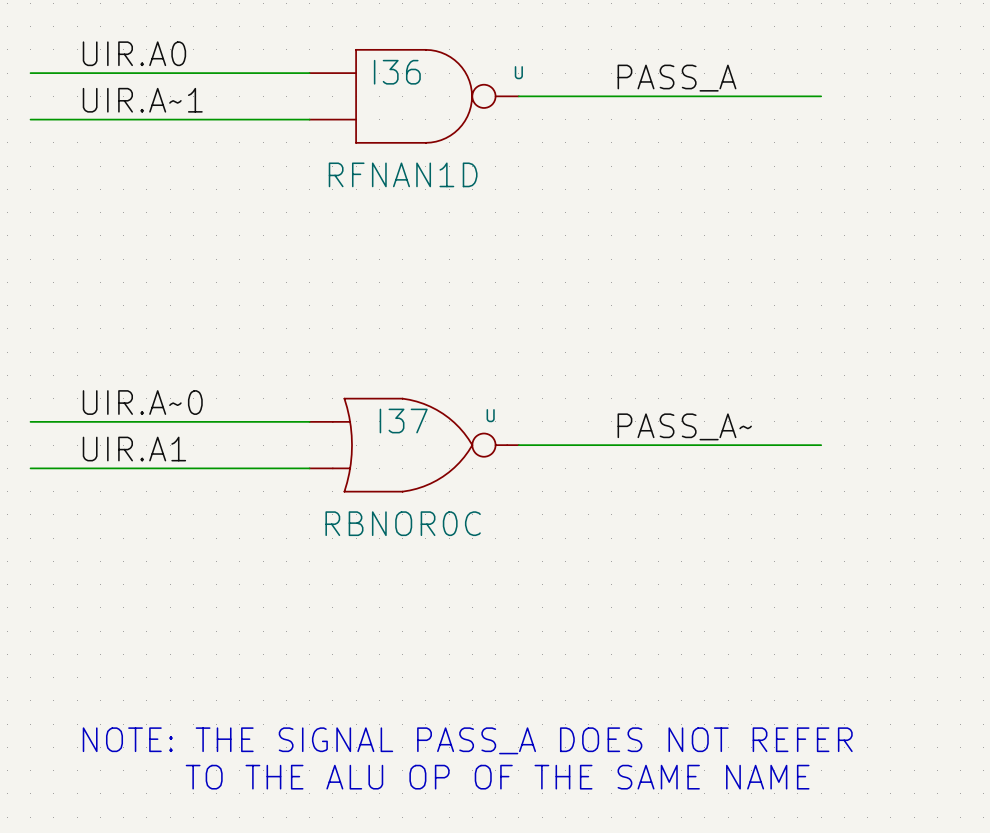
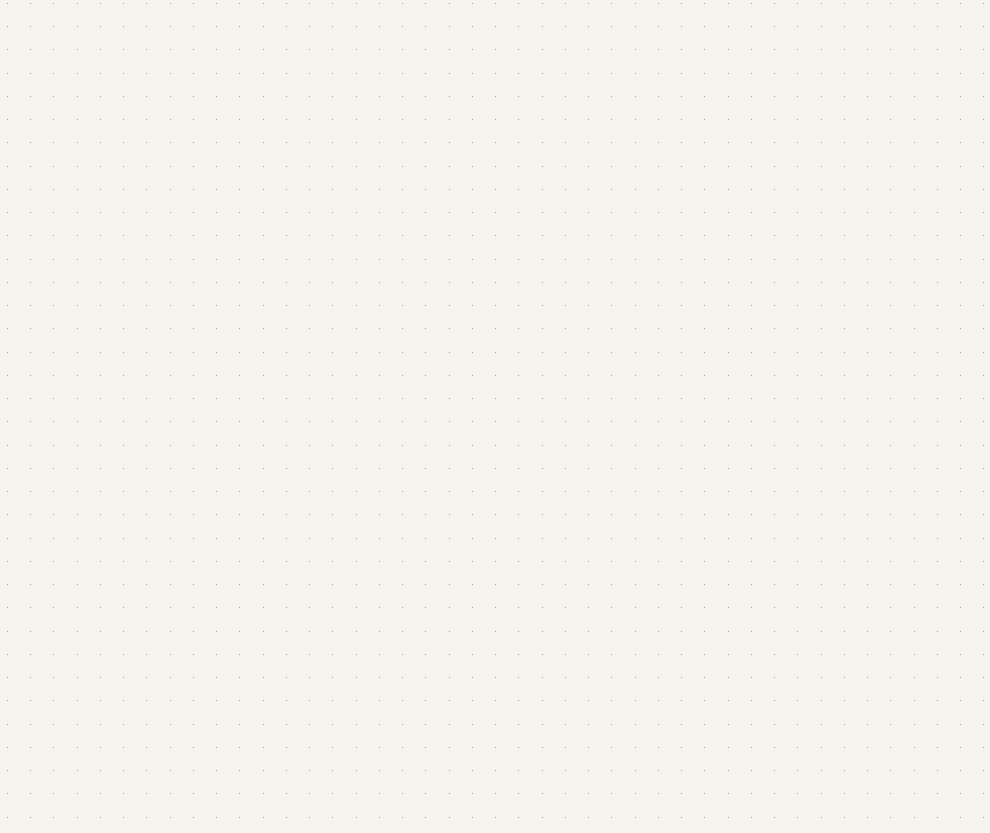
label: UIR.A0 (134, 53) -> none
wire: (30, 73) (309, 73) -> none
label: PASS_A (676, 78) -> none
U: (414, 96) -> none
wire: (518, 96) (821, 96) -> none
label: UIR.A~1 (142, 100) -> none
wire: (30, 119) (309, 119) -> none
label: UIR.A~0 (142, 402) -> none
wire: (30, 421) (309, 421) -> none
label: PASS_A~ (684, 426) -> none
U: (414, 445) -> none
wire: (518, 445) (821, 445) -> none
label: UIR.A1 (134, 449) -> none
wire: (30, 468) (309, 468) -> none
text: NOTE: THE SIGNAL PASS_A DOES NOT REFER (467, 740) -> none
text: TO THE ALU OP OF THE SAME NAME (497, 777) -> none

